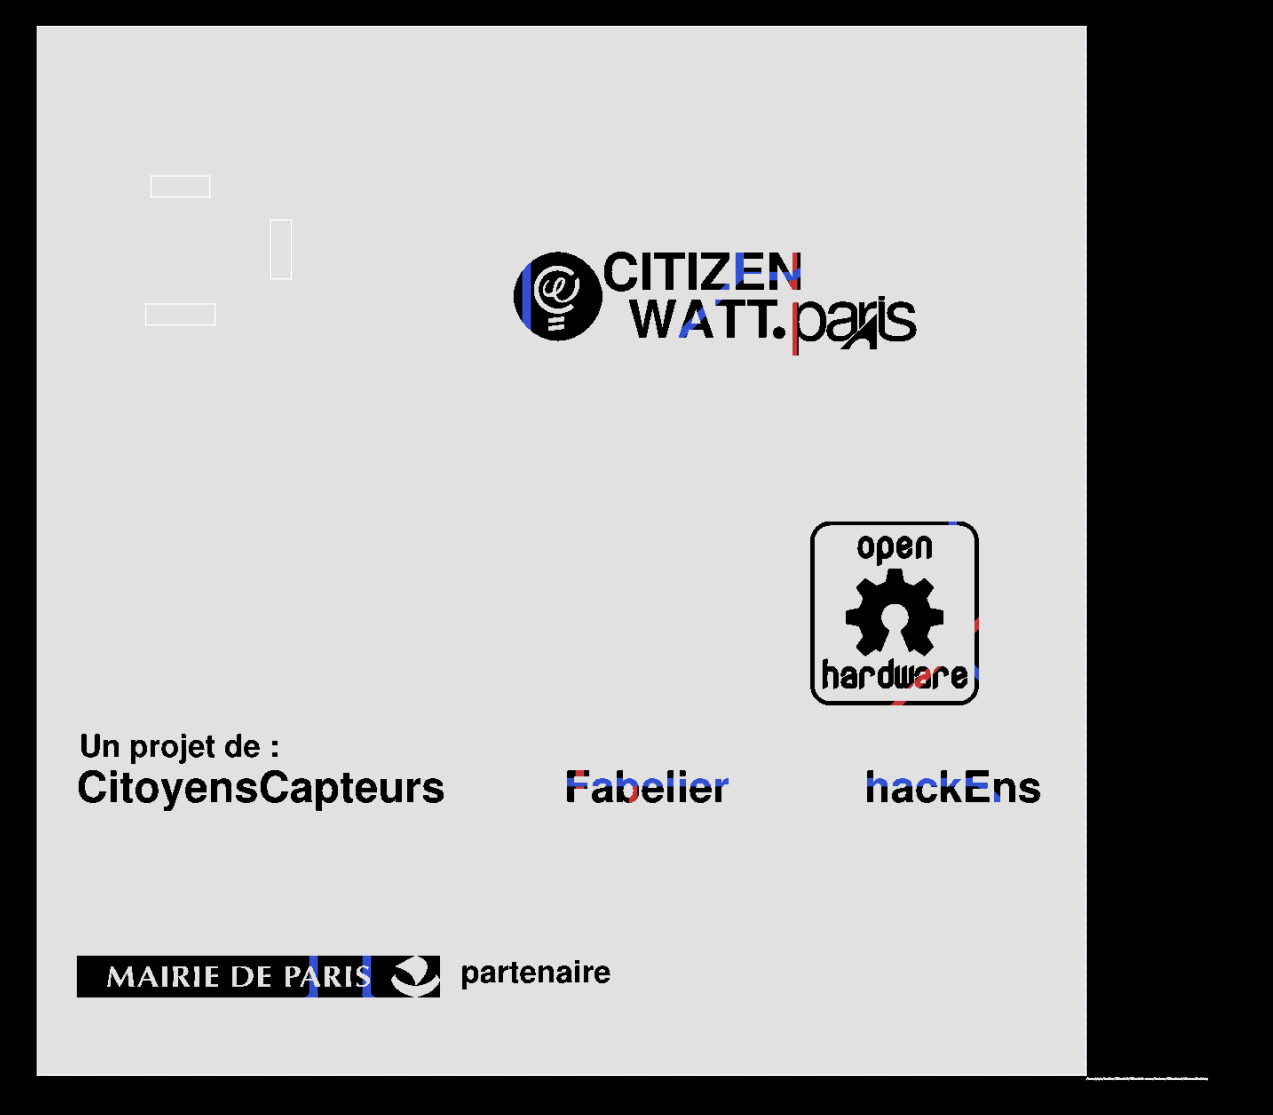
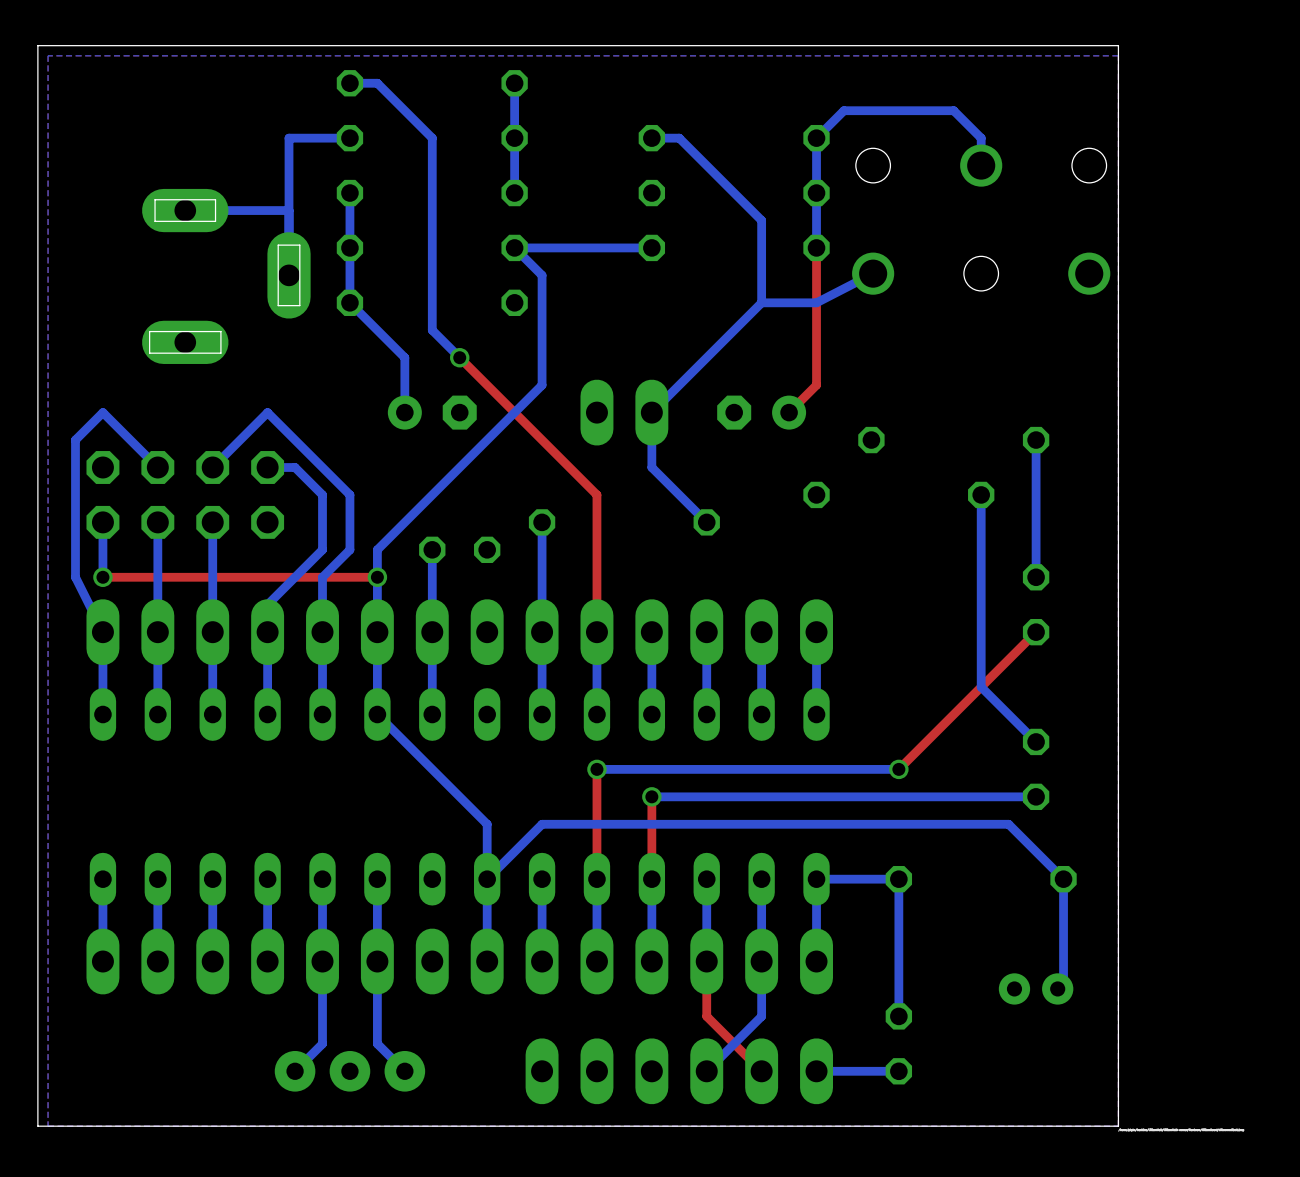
drawing: [37, 27, 1087, 1076] -> none

